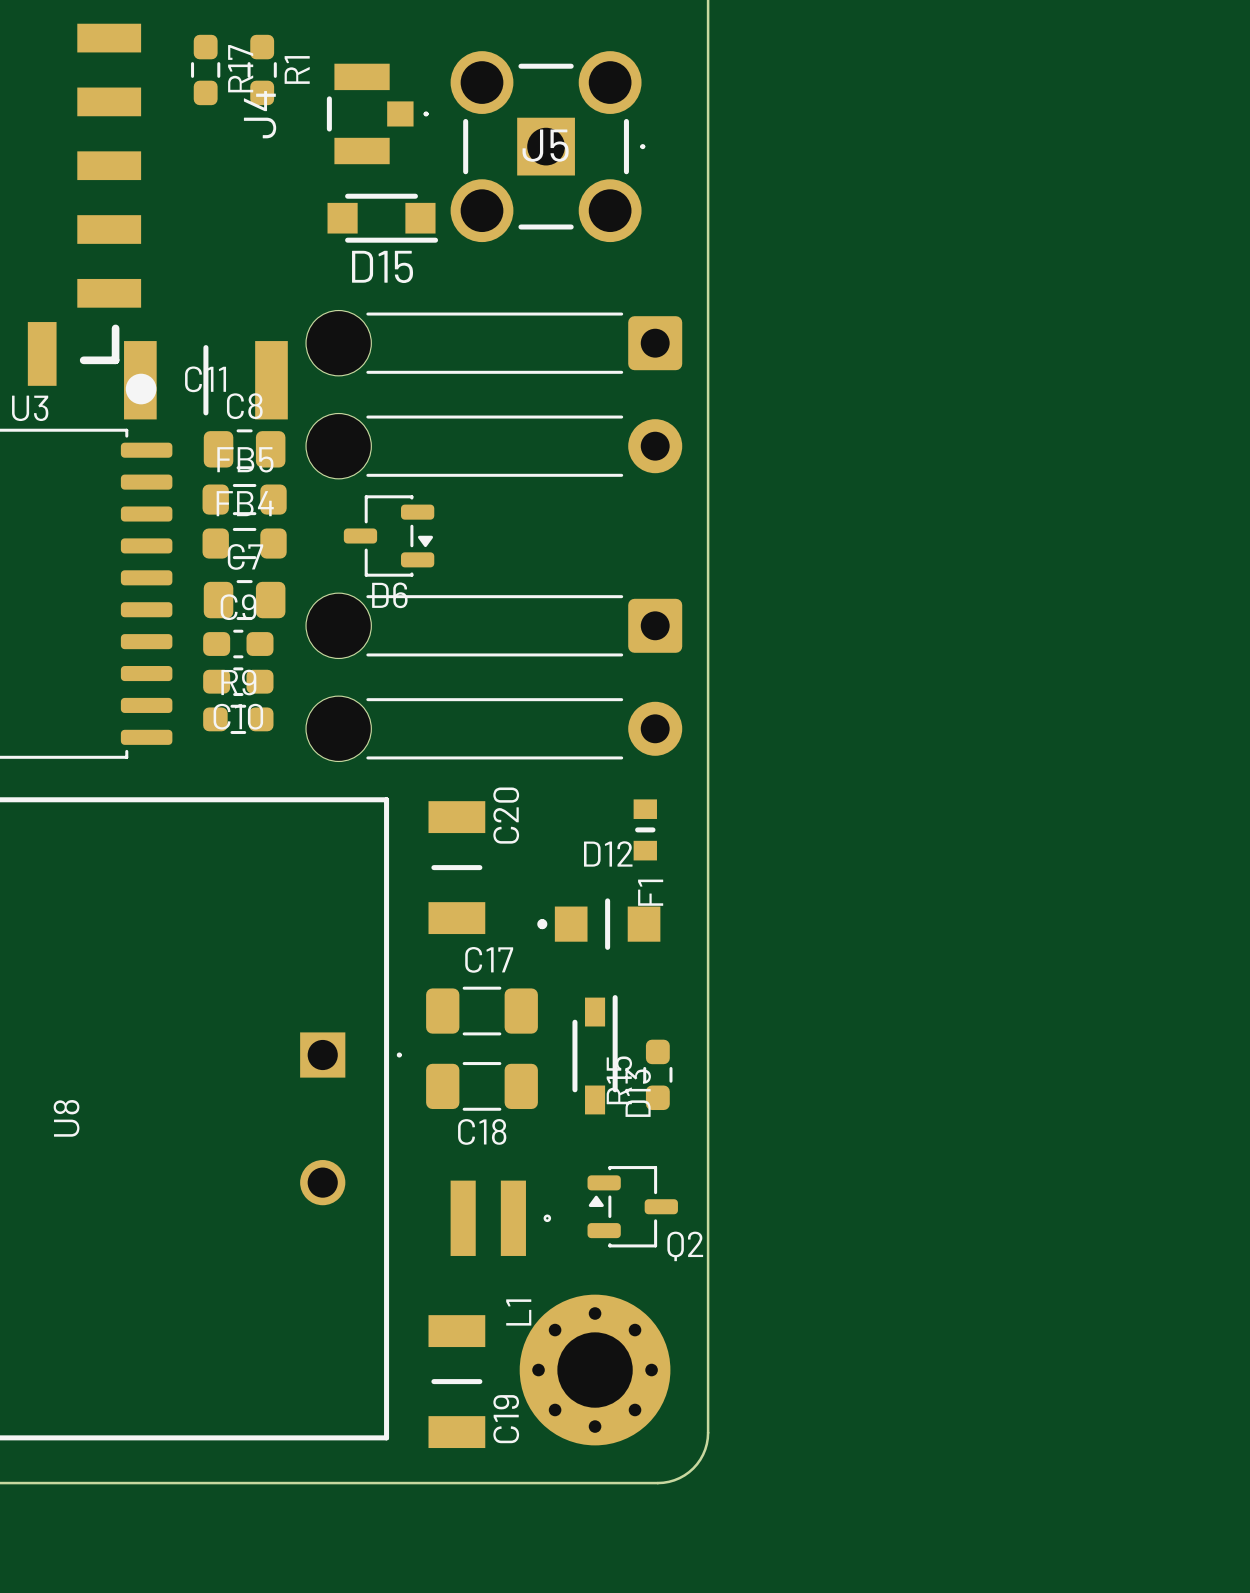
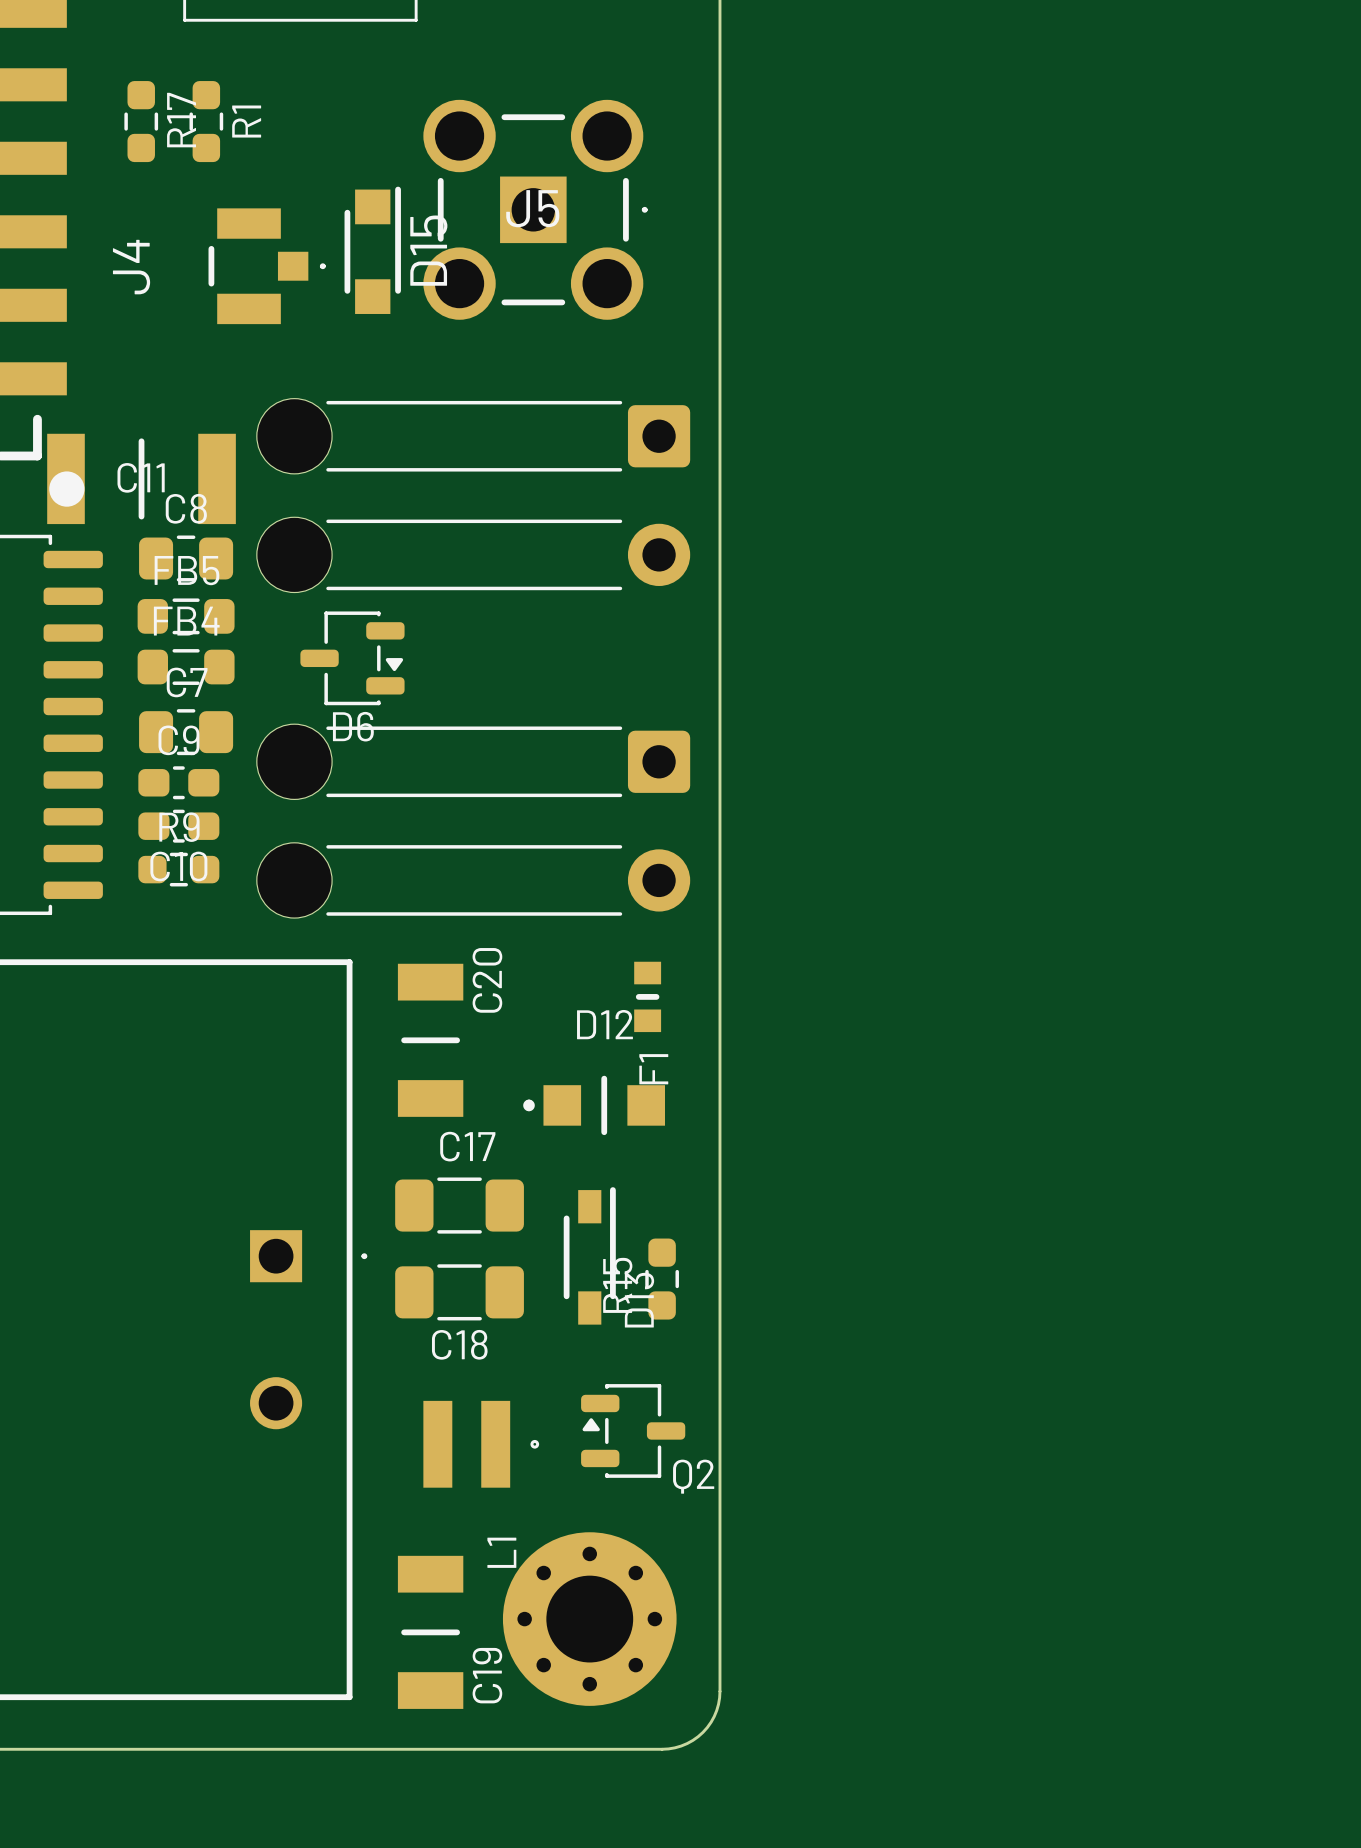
J4 position: (377, 113) -> (267, 266)
D15 rotation: 0° (382, 218) -> 90° counterclockwise (372, 250)

